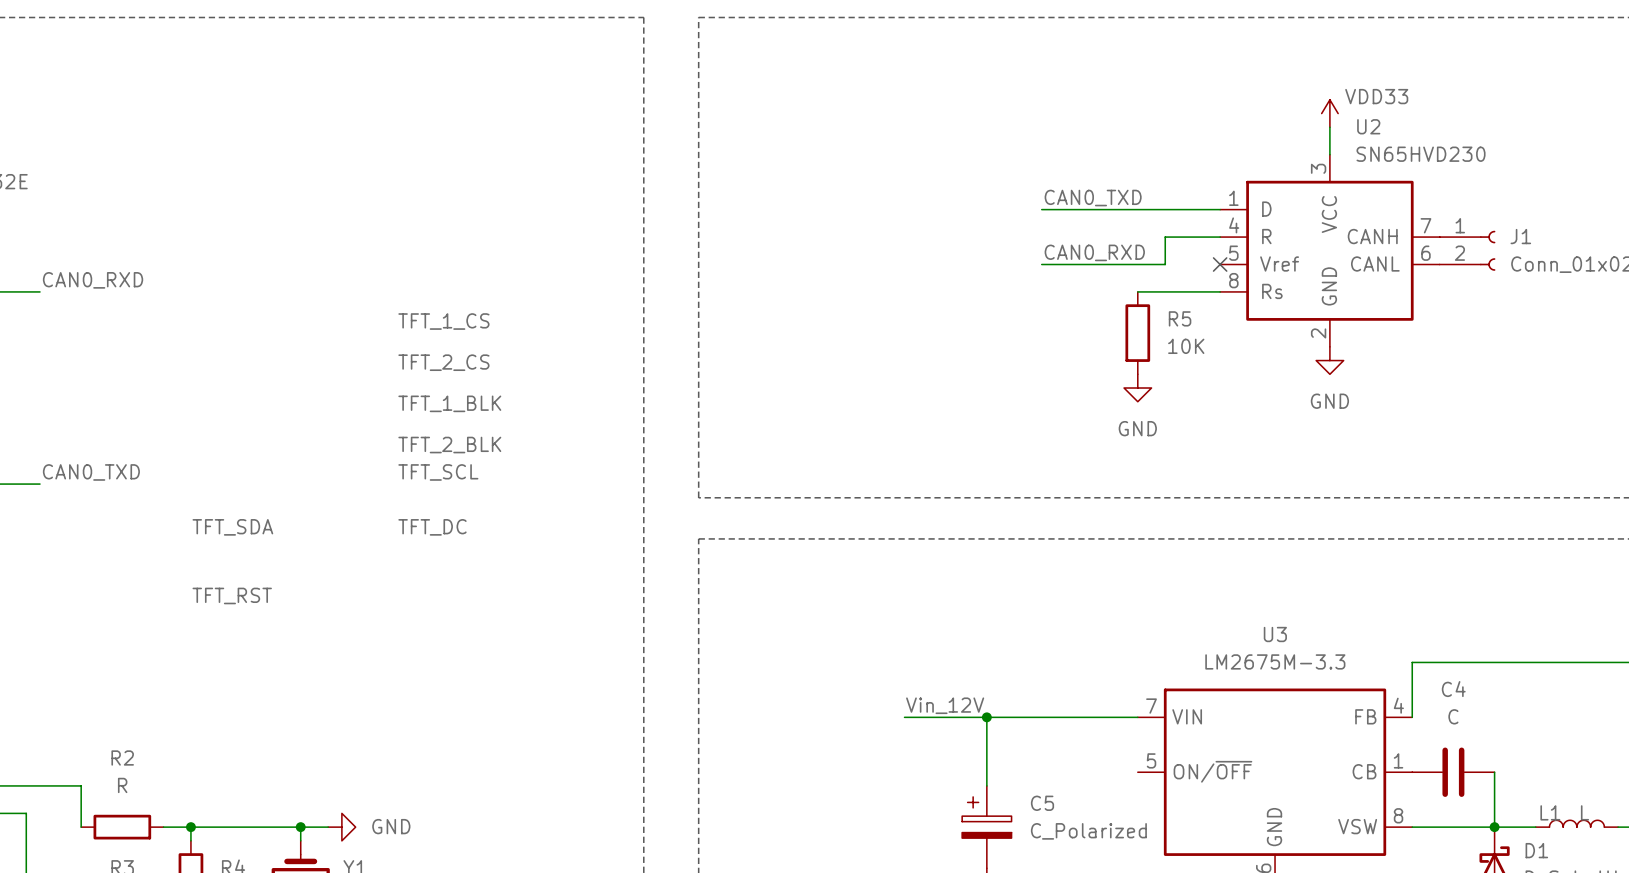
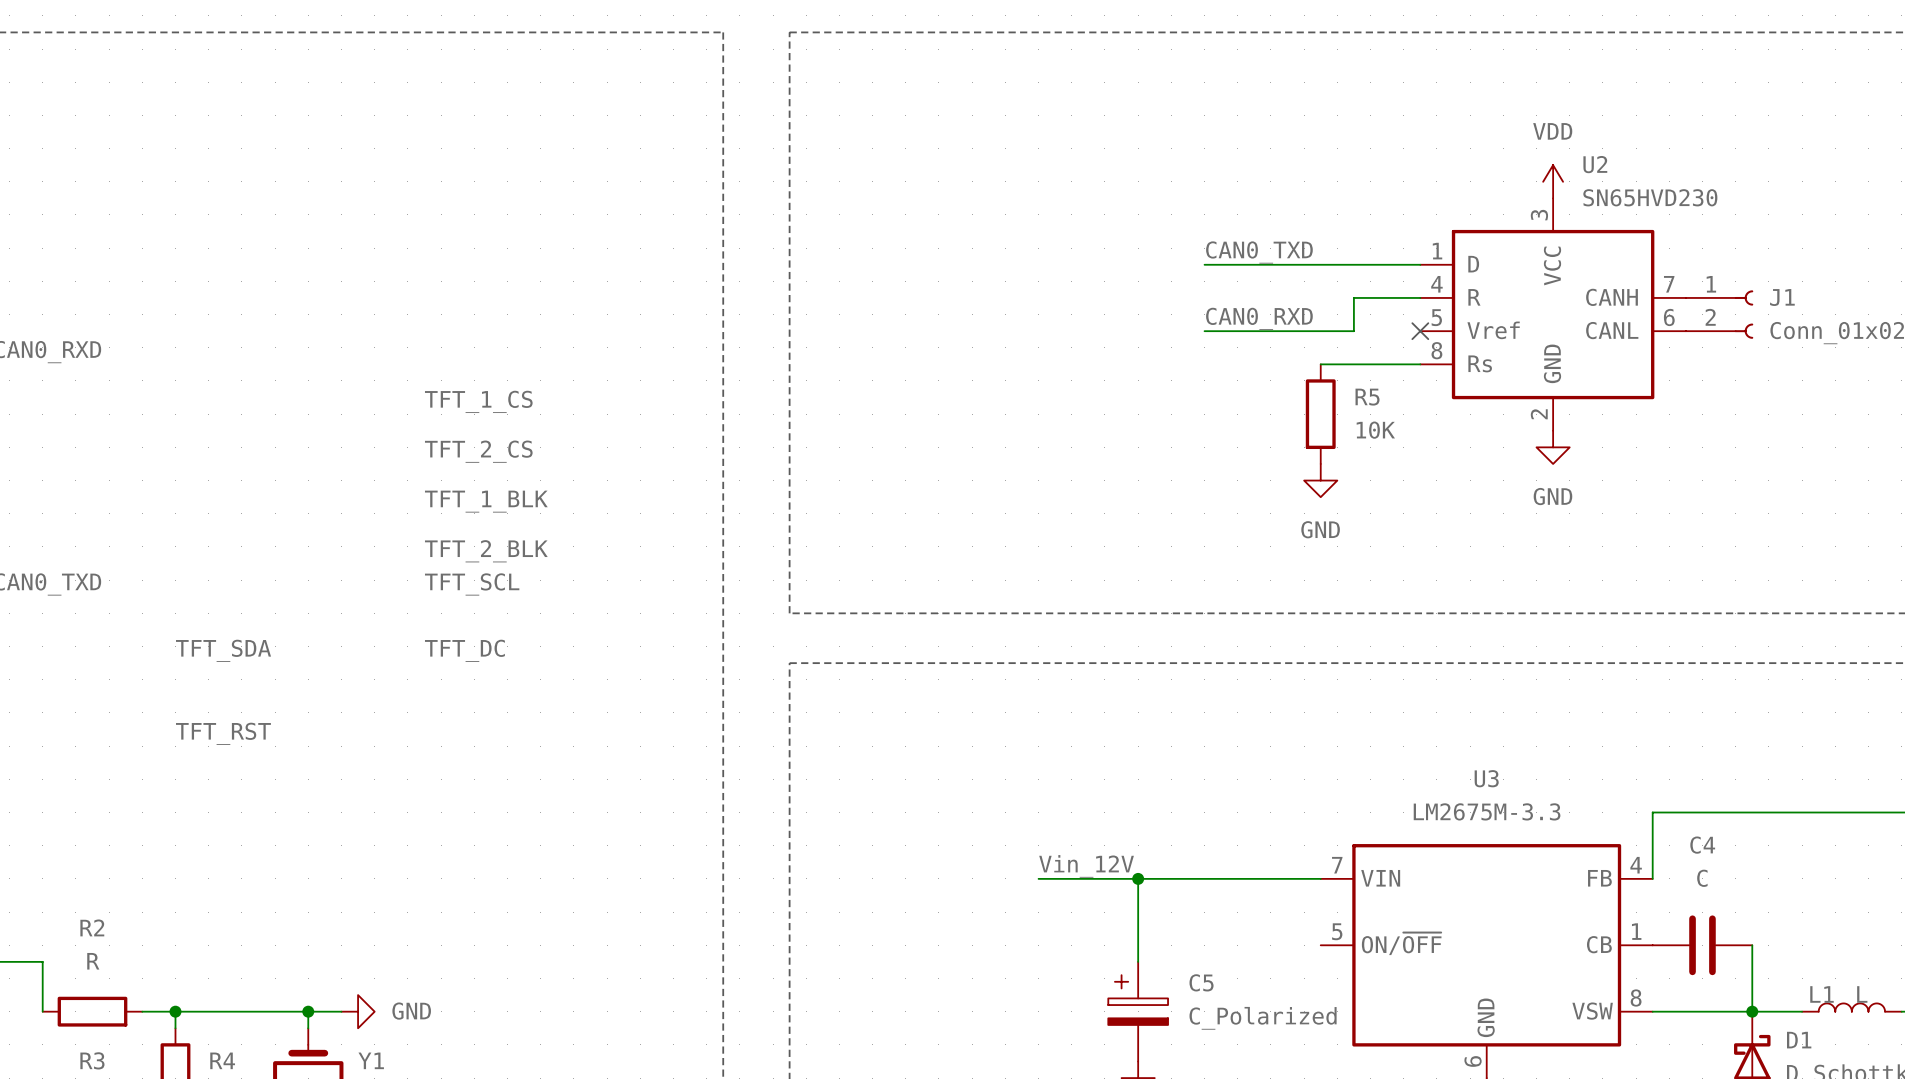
power symbol: VDD33 (1329, 113) -> none
power symbol: none -> VDD (1553, 181)

